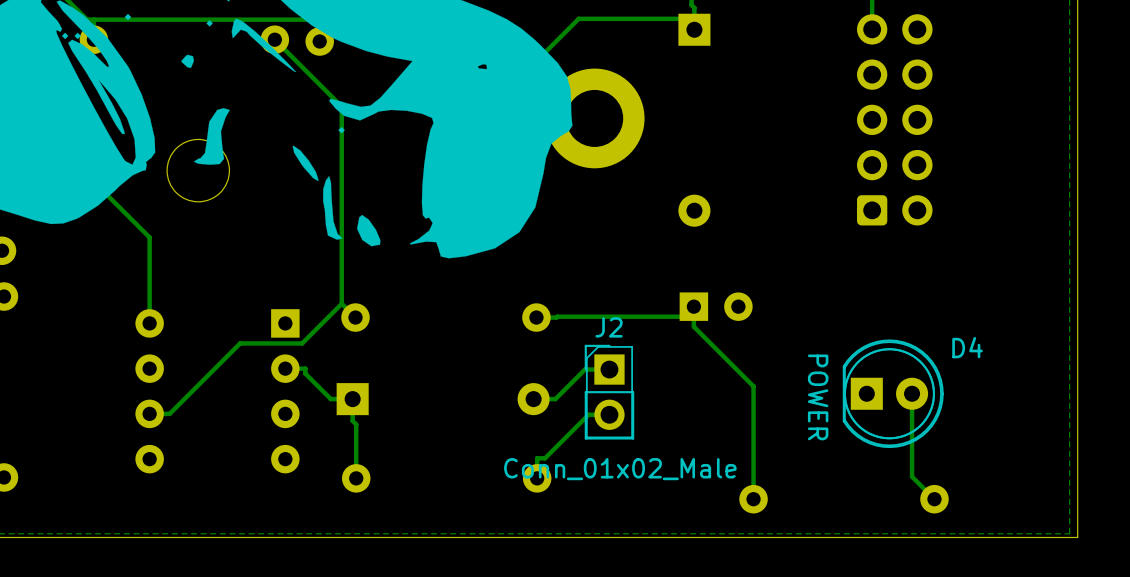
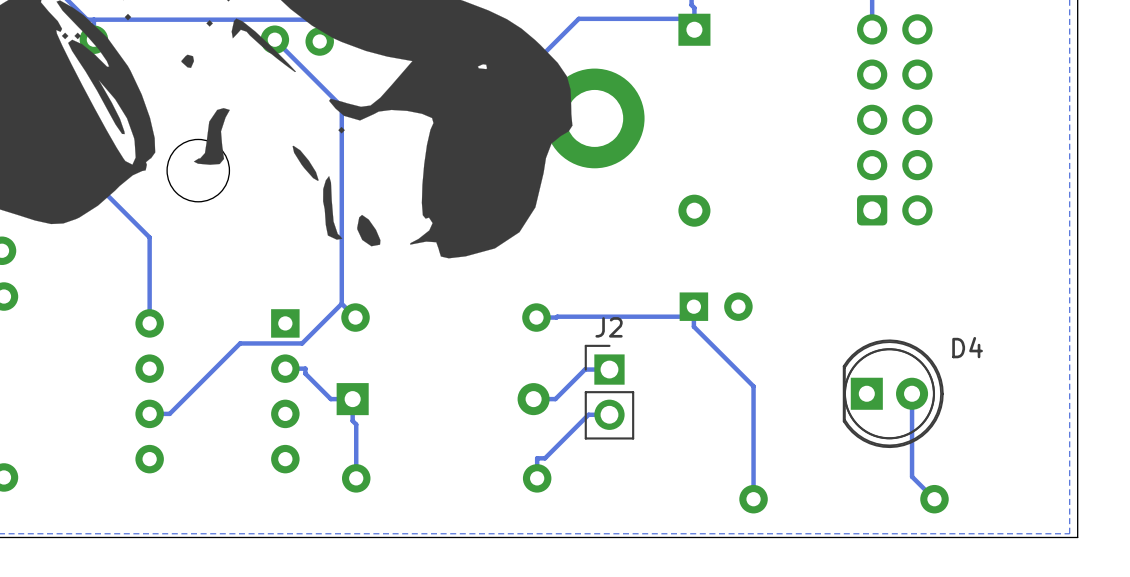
J2 footprint: [584, 344, 635, 440] -> [584, 344, 635, 440]
D4 value: POWER (818, 397) -> none
J2 value: Conn_01x02_Male (620, 469) -> none

